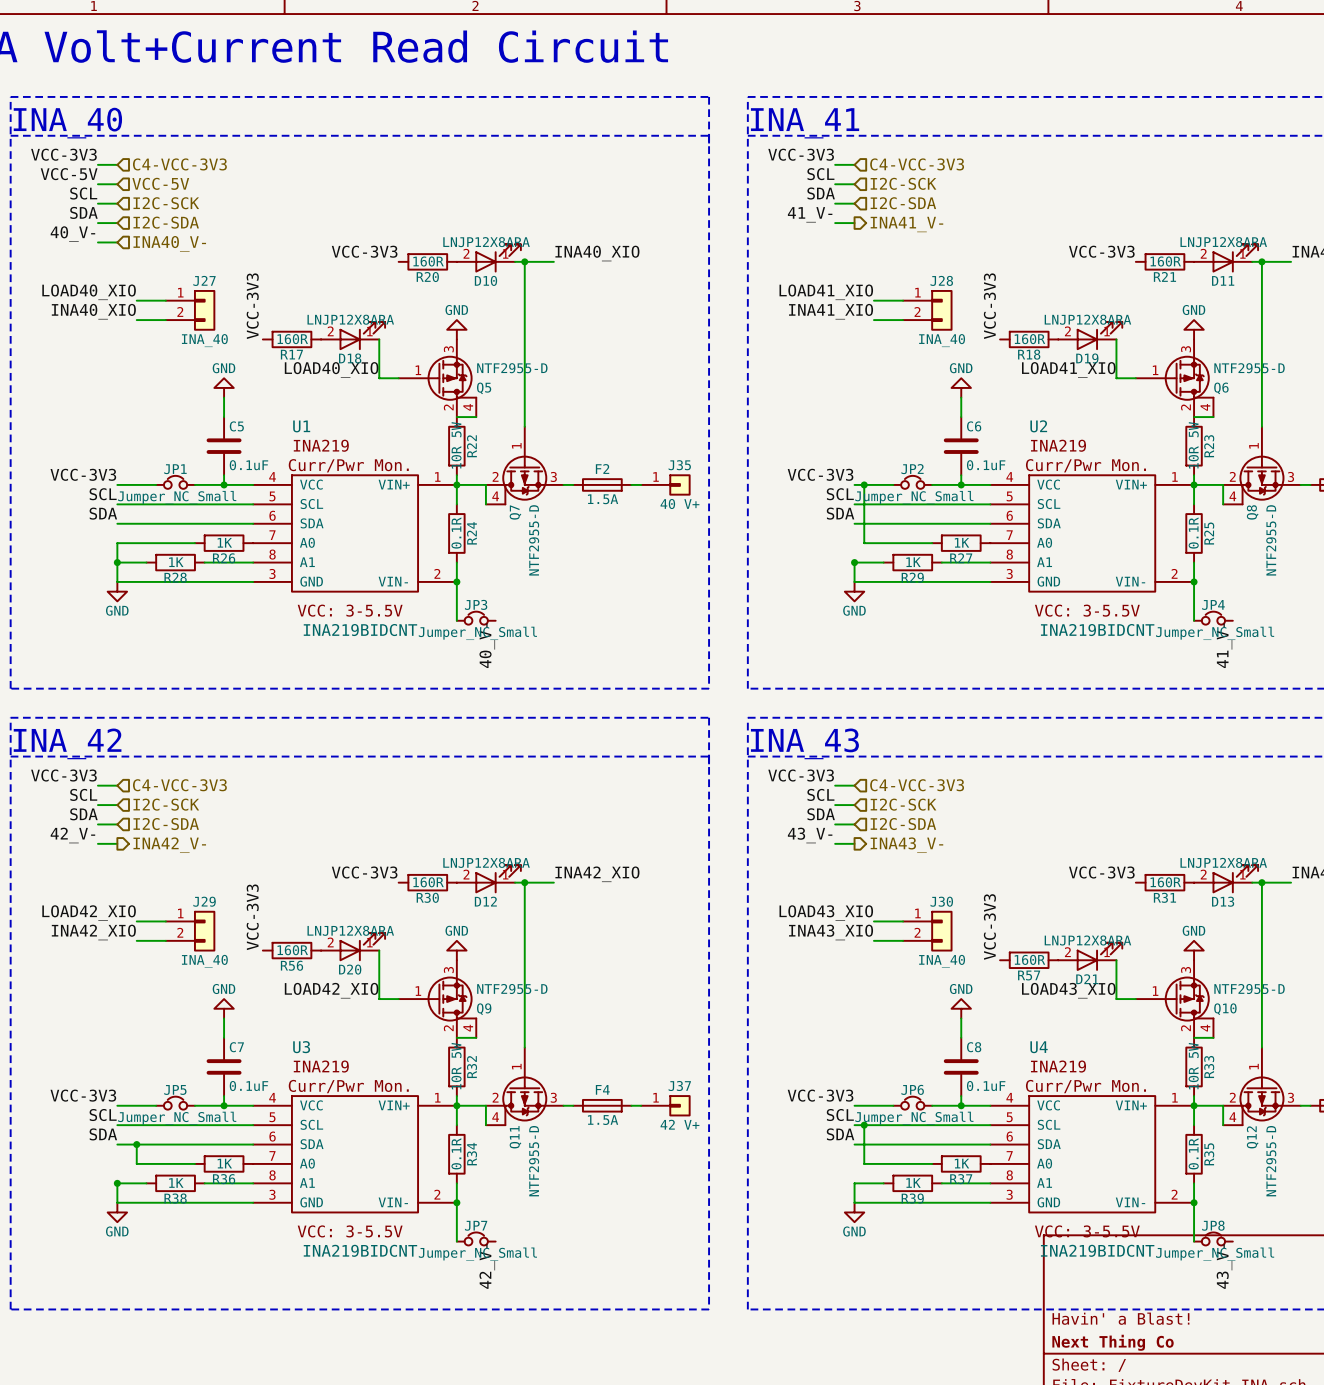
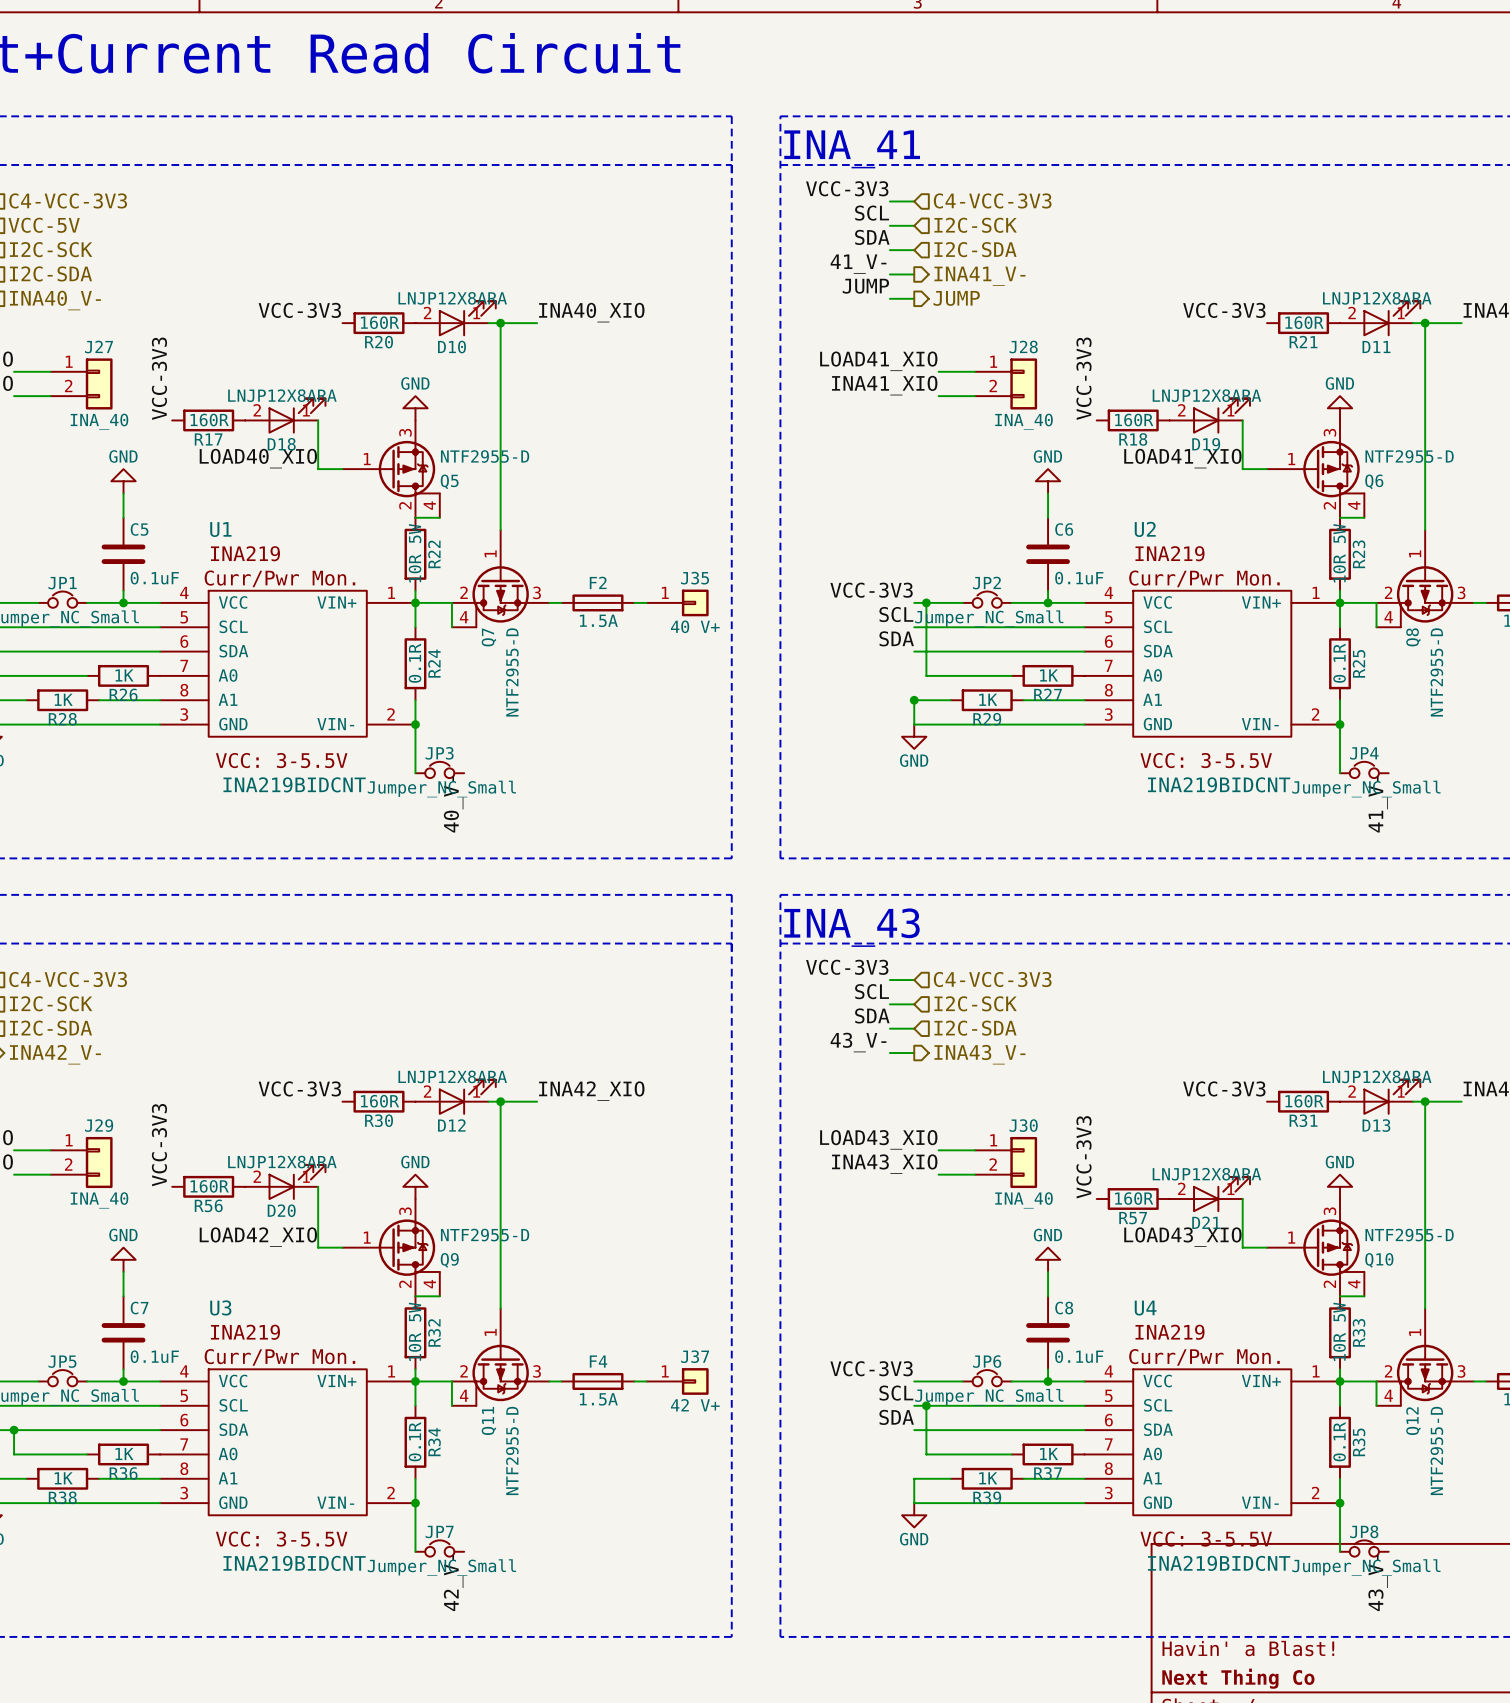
label: none -> JUMP (865, 286)
wire: none -> (889, 298) (914, 298)
hierarchical label: none -> JUMP (956, 298)

